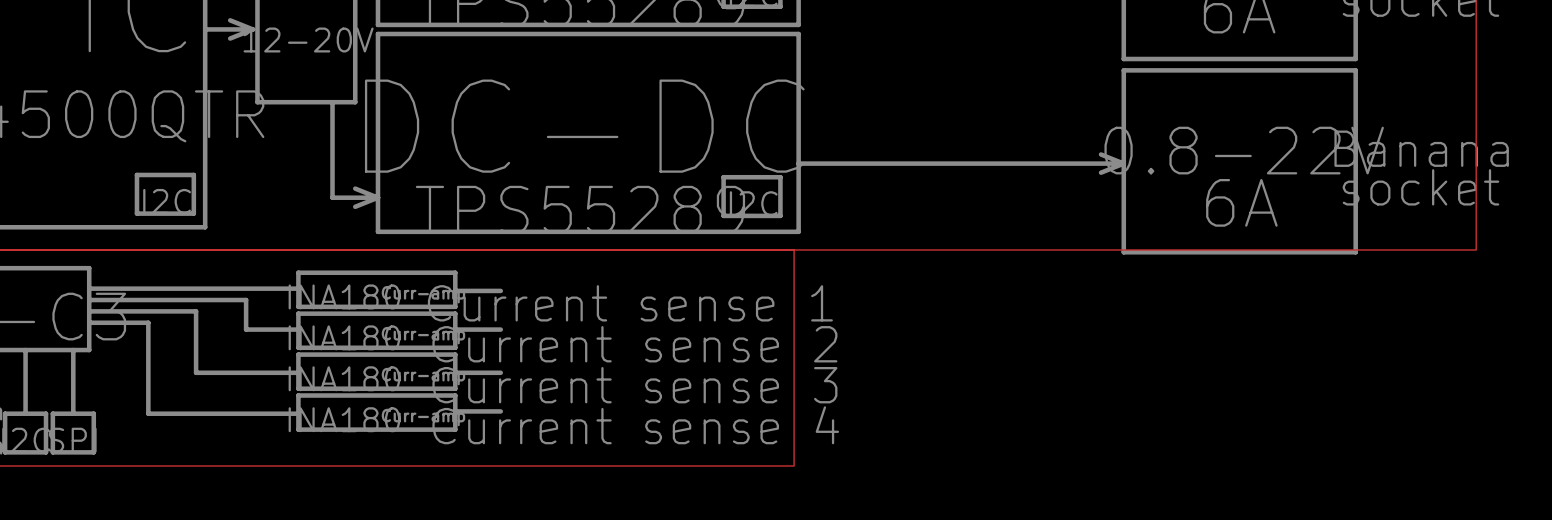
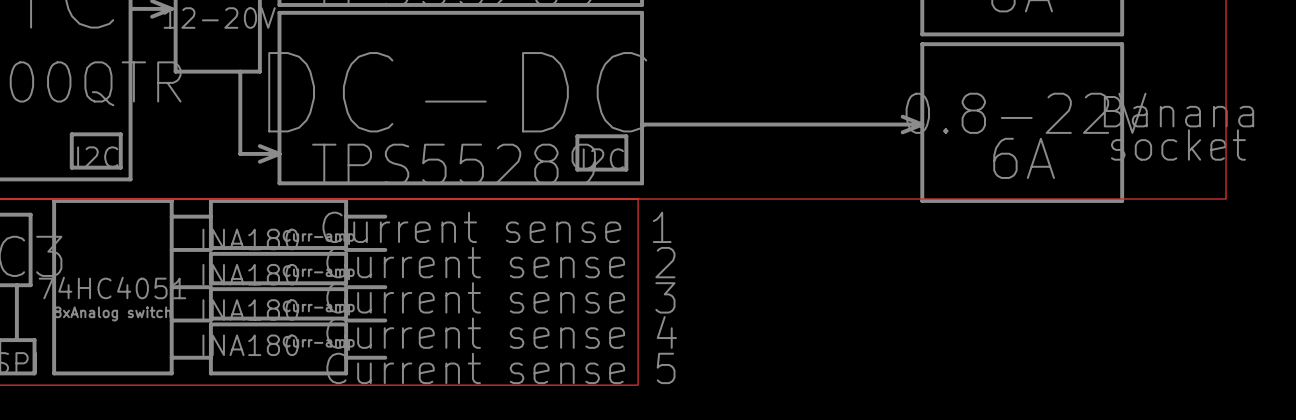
line: none -> (54, 200) (171, 200) (171, 373) (54, 373) (54, 200)
line: none -> (171, 216) (210, 216)
line: (298, 272) (455, 272) -> (210, 218) (210, 200) (346, 200) (346, 218)
line: (89, 288) (298, 288) -> none
line: (455, 290) (500, 290) -> (346, 216) (385, 216)
line: (89, 300) (246, 300) (246, 329) (298, 329) -> none
text position: Current sense 1 (630, 303) -> Current sense 1 (497, 227)
line: none -> (171, 249) (210, 249)
line: (89, 311) (196, 311) (196, 372) (298, 372) -> none
line: (89, 322) (148, 322) (148, 413) (298, 413) -> none
line: (455, 329) (500, 329) -> (346, 249) (385, 249)
text position: Current sense 2 (634, 344) -> Current sense 2 (500, 262)
line: none -> (171, 287) (210, 287)
text: none -> 74HC4051 (112, 287)
line: (455, 372) (500, 372) -> (346, 287) (385, 287)
text: none -> 8xAnalog switch (112, 313)
text position: Current sense 3 (634, 385) -> Current sense 3 (500, 297)
line: none -> (171, 320) (210, 320)
line: (455, 411) (500, 411) -> (346, 320) (385, 320)
text position: Current sense 4 (635, 425) -> Current sense 4 (501, 332)
line: (298, 429) (455, 429) -> (210, 353) (210, 373) (346, 373) (346, 353)
line: none -> (171, 357) (210, 357)
line: none -> (346, 357) (385, 357)
text: none -> Current sense 5 (500, 368)

